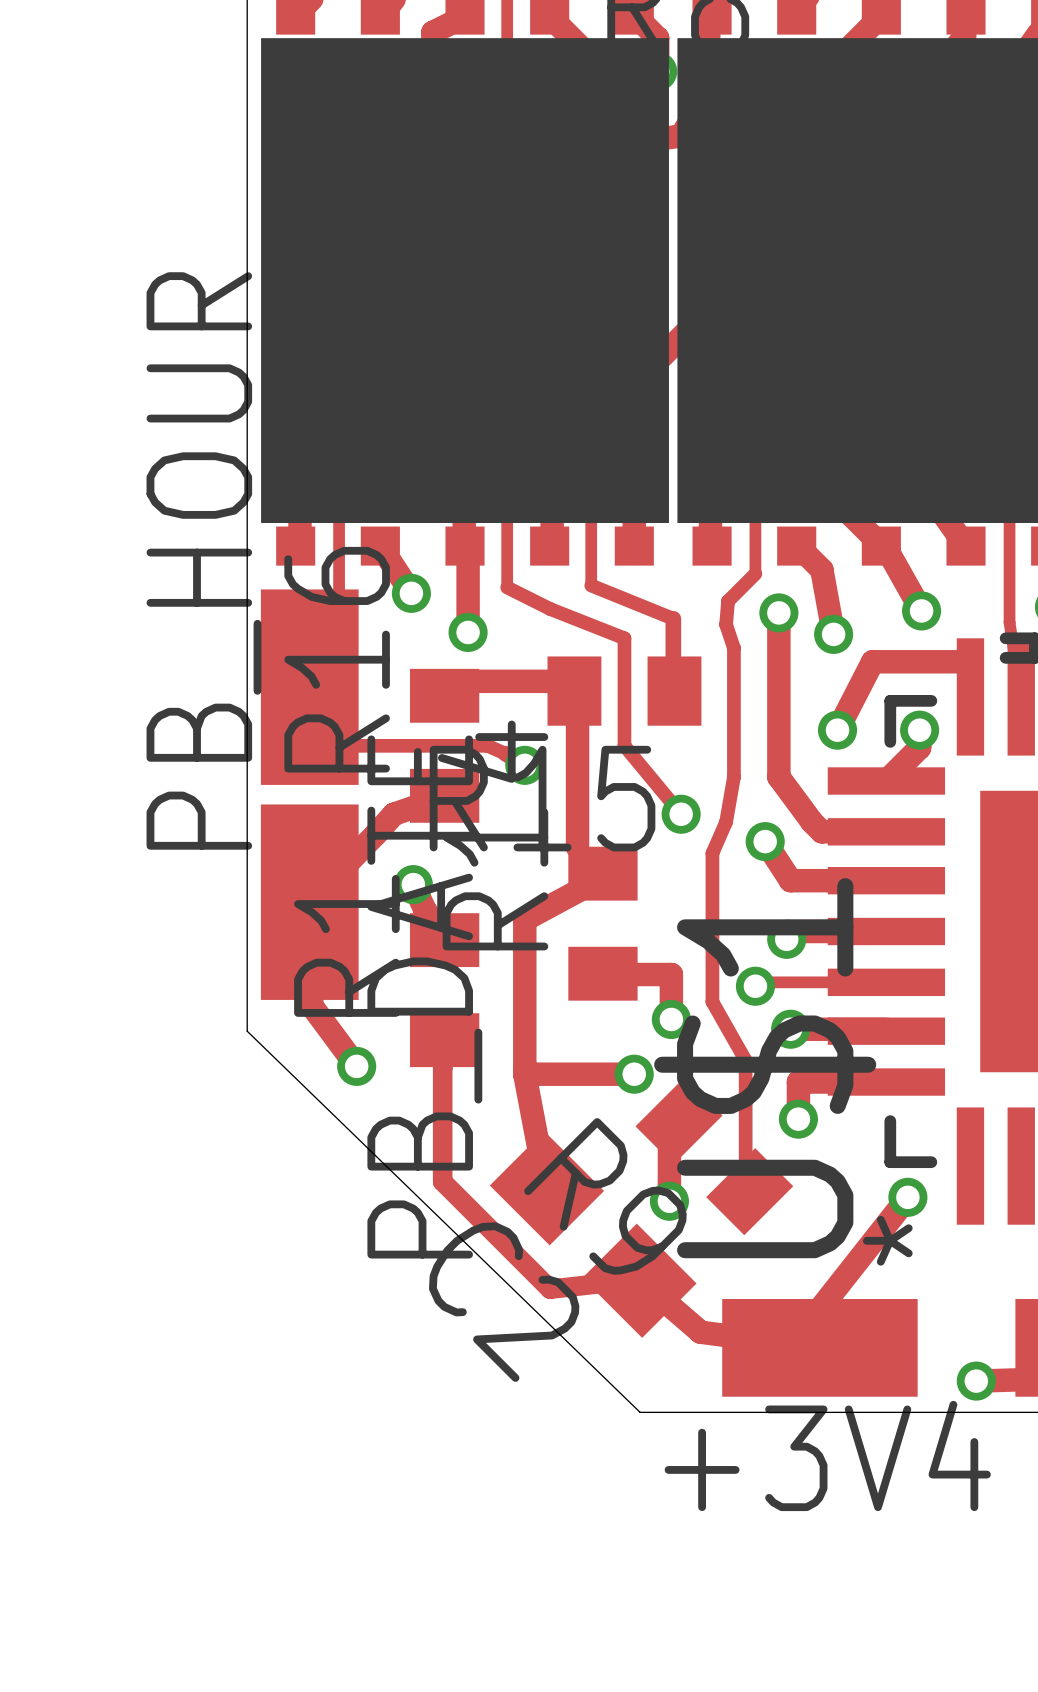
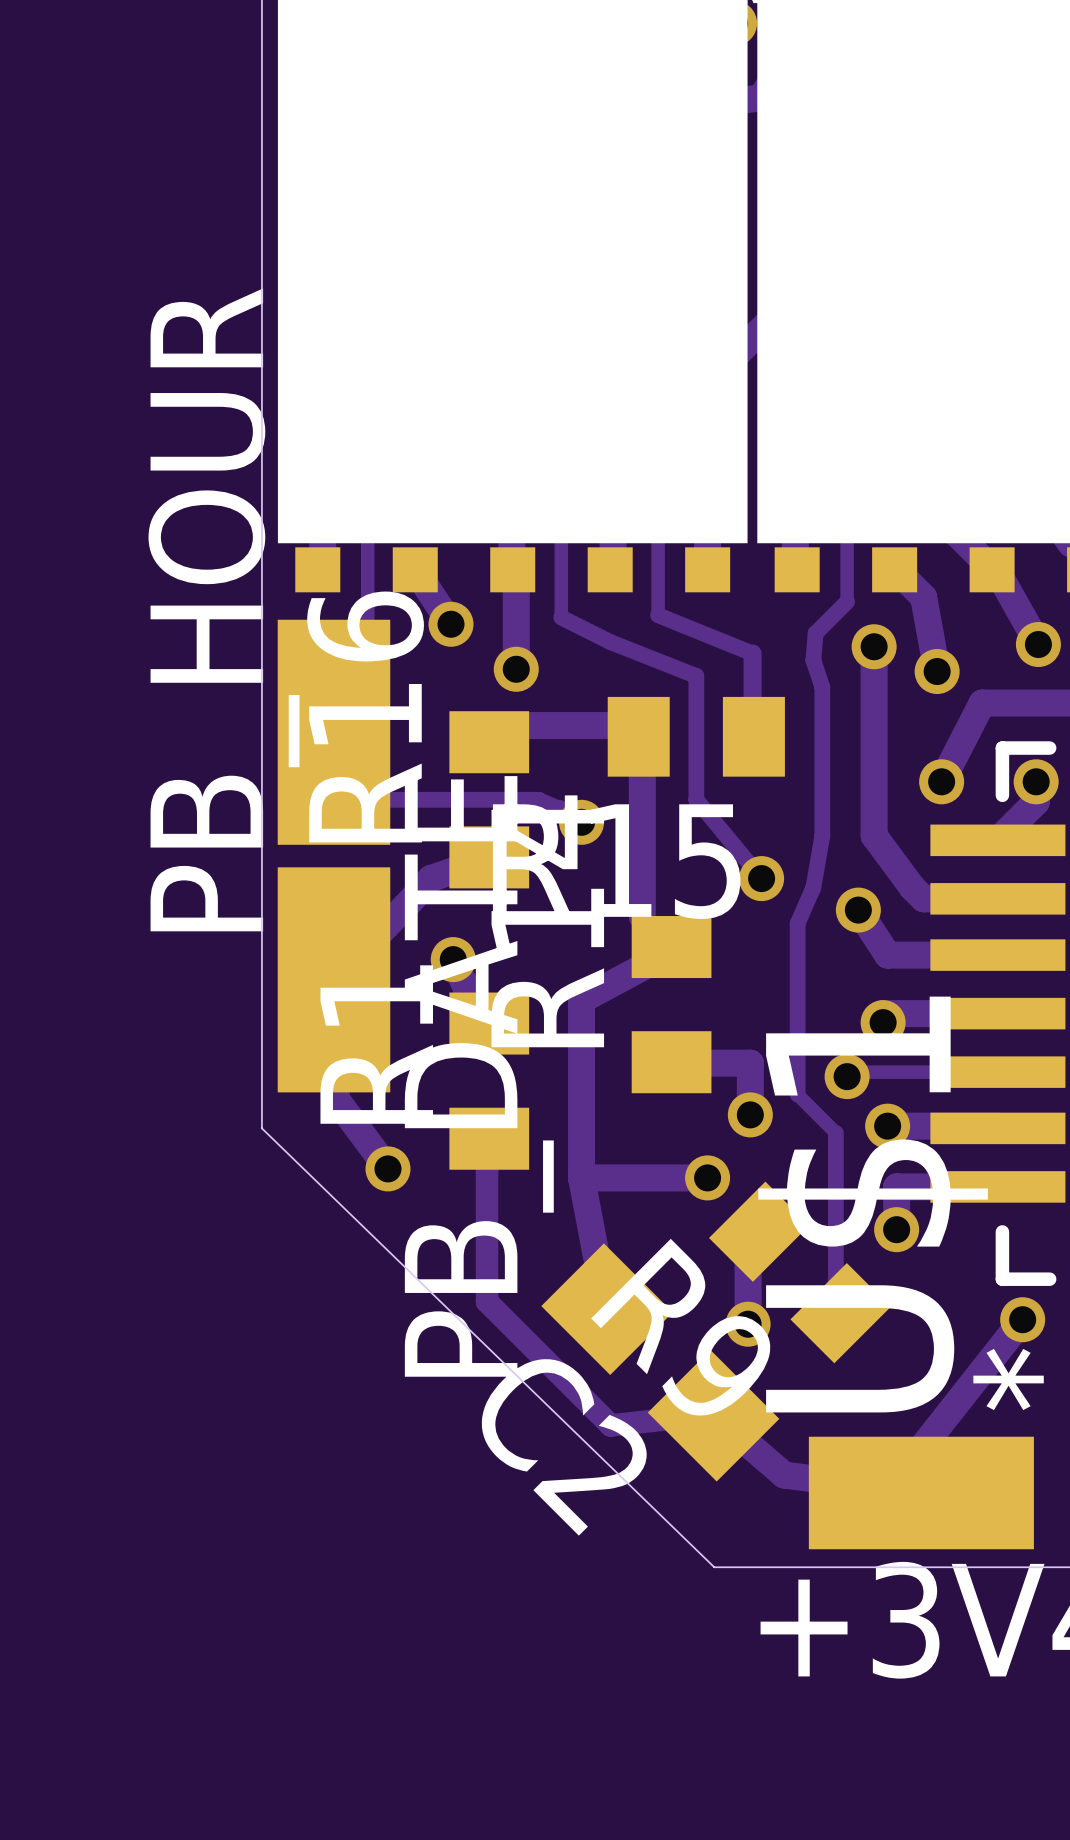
track: (712, 1001) (745, 1060) -> (797, 1094) (835, 1132) (835, 1162)

